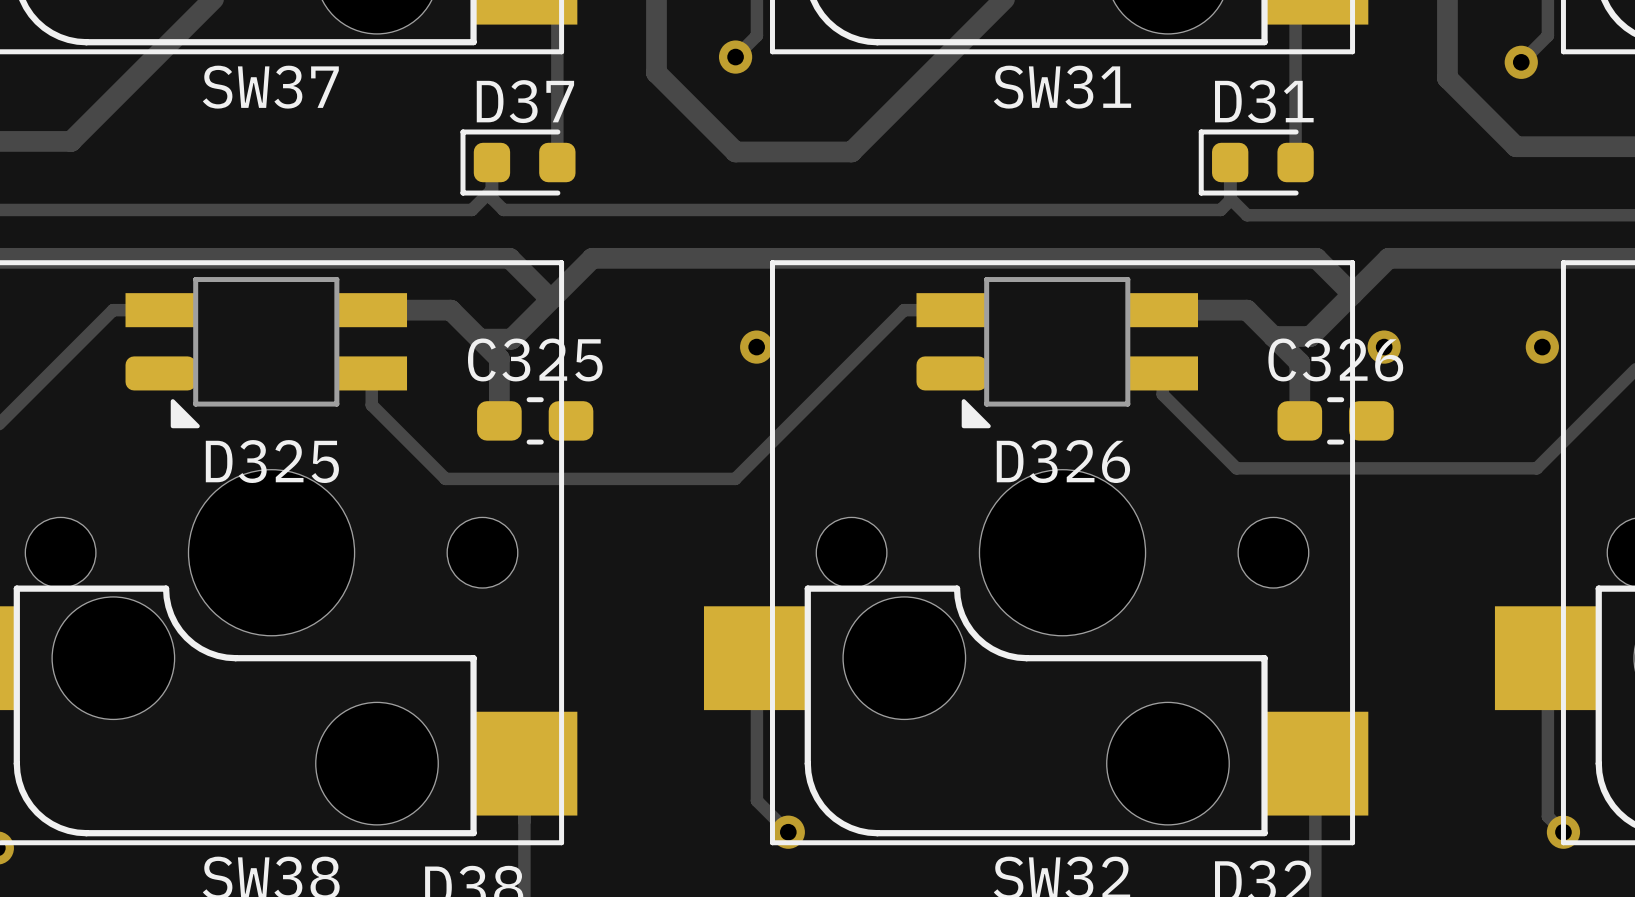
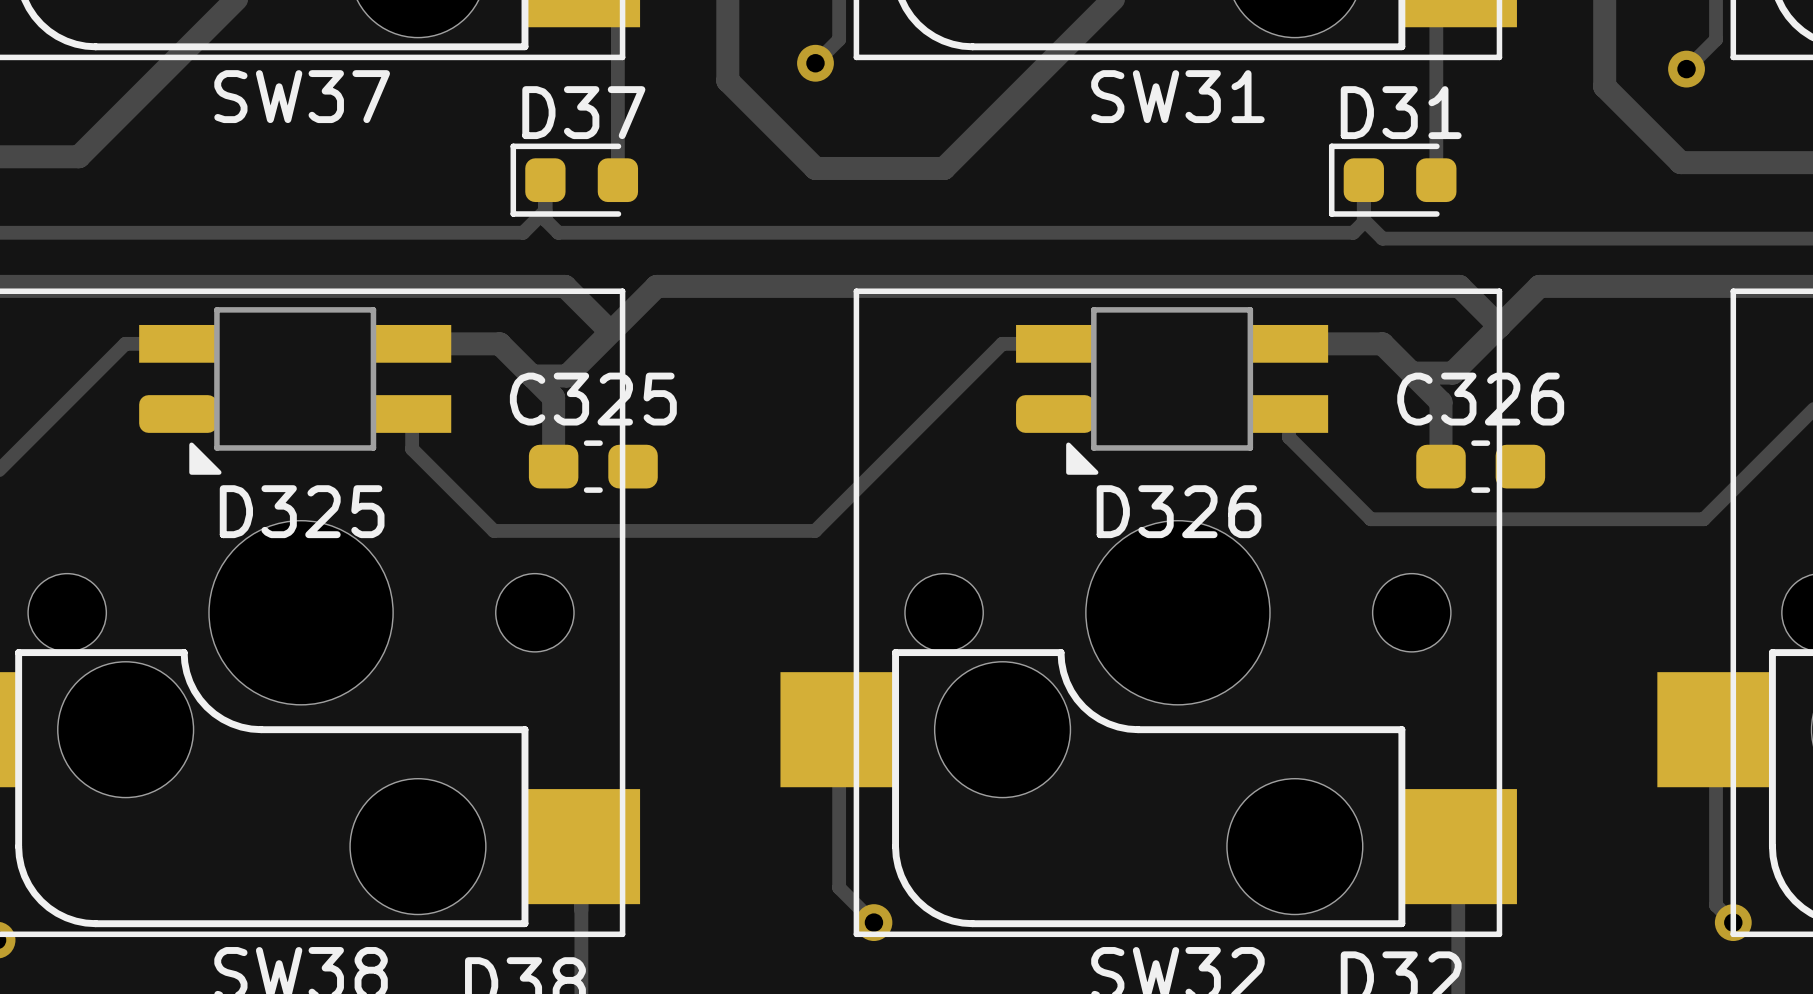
via: (756, 347) -> none
via: (1384, 347) -> none
via: (1542, 347) -> none

